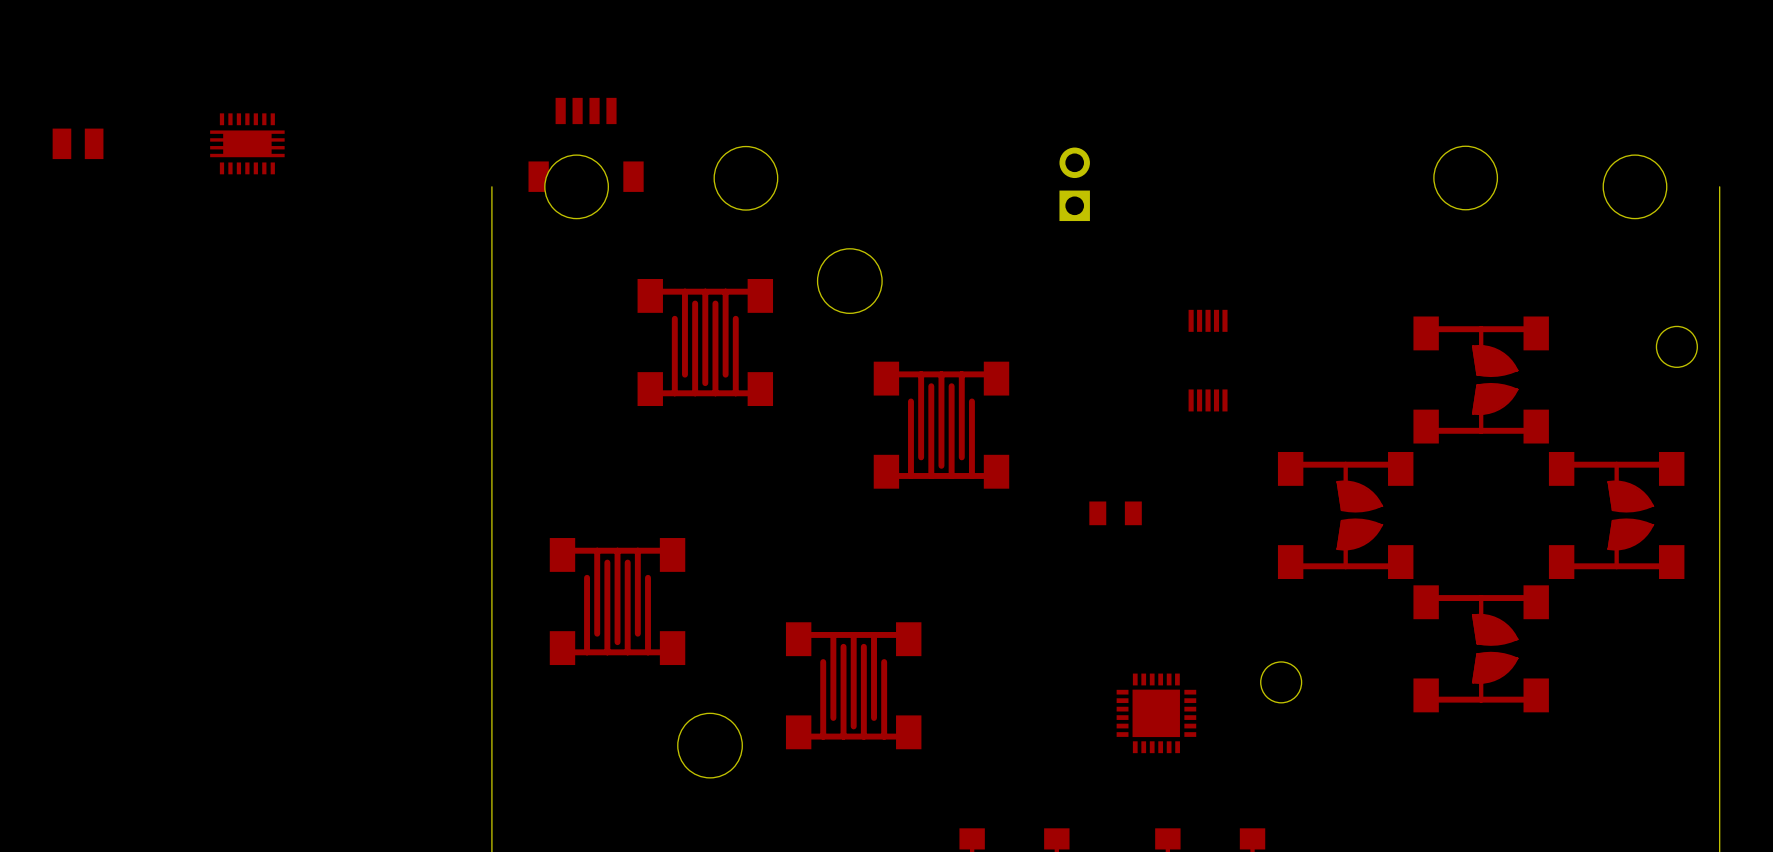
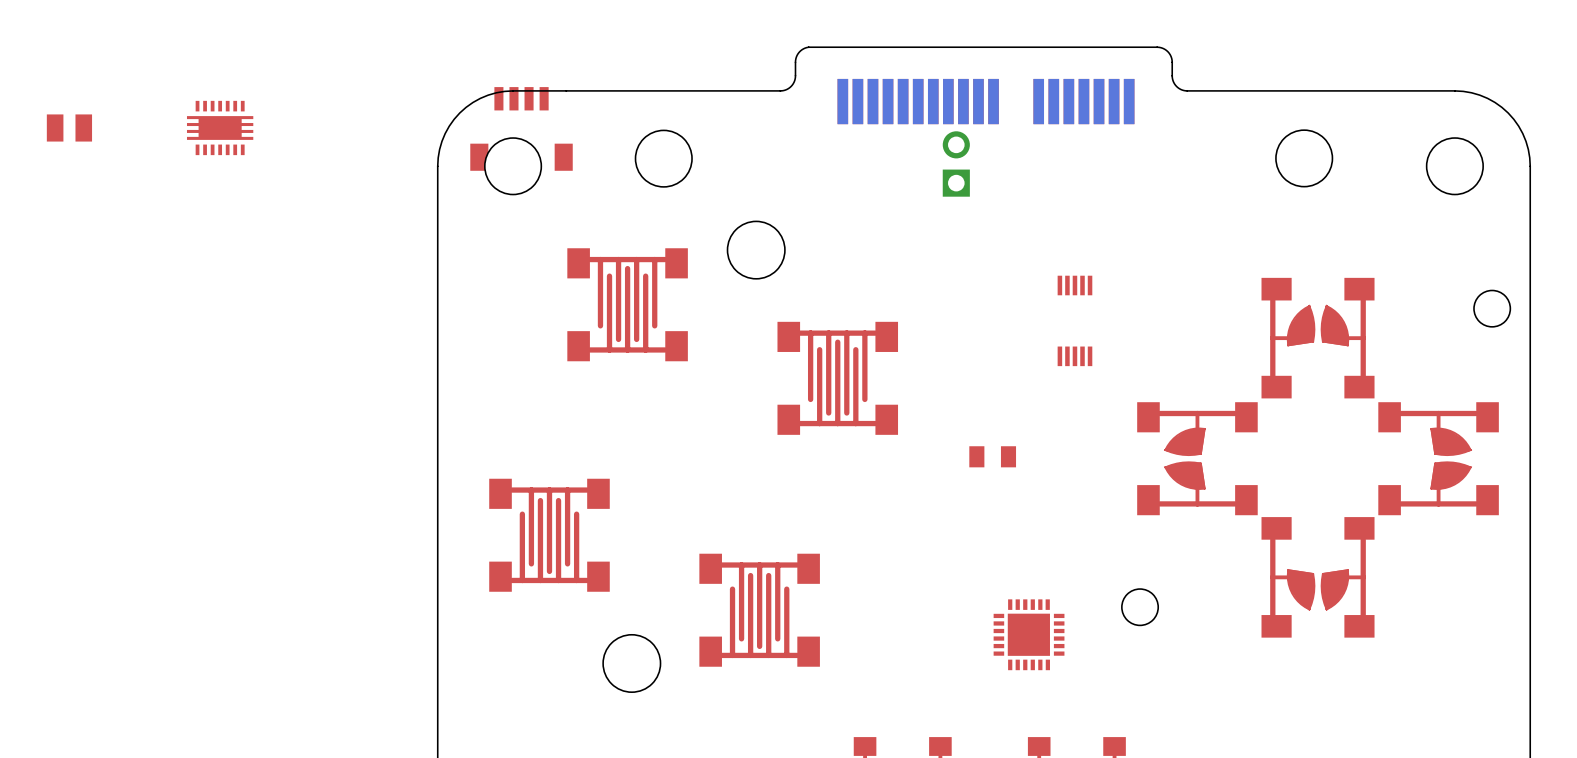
drawing: none -> [437, 46, 1531, 167]
part: none -> (985, 101)
part rotation: 0° (705, 342) -> 180° (627, 304)
part rotation: 0° (1481, 380) -> 90° counterclockwise (1318, 338)
part rotation: 0° (941, 425) -> 180° (837, 378)
part rotation: 0° (1345, 515) -> 180° (1197, 458)
part rotation: 0° (1481, 648) -> 90° clockwise (1318, 577)

